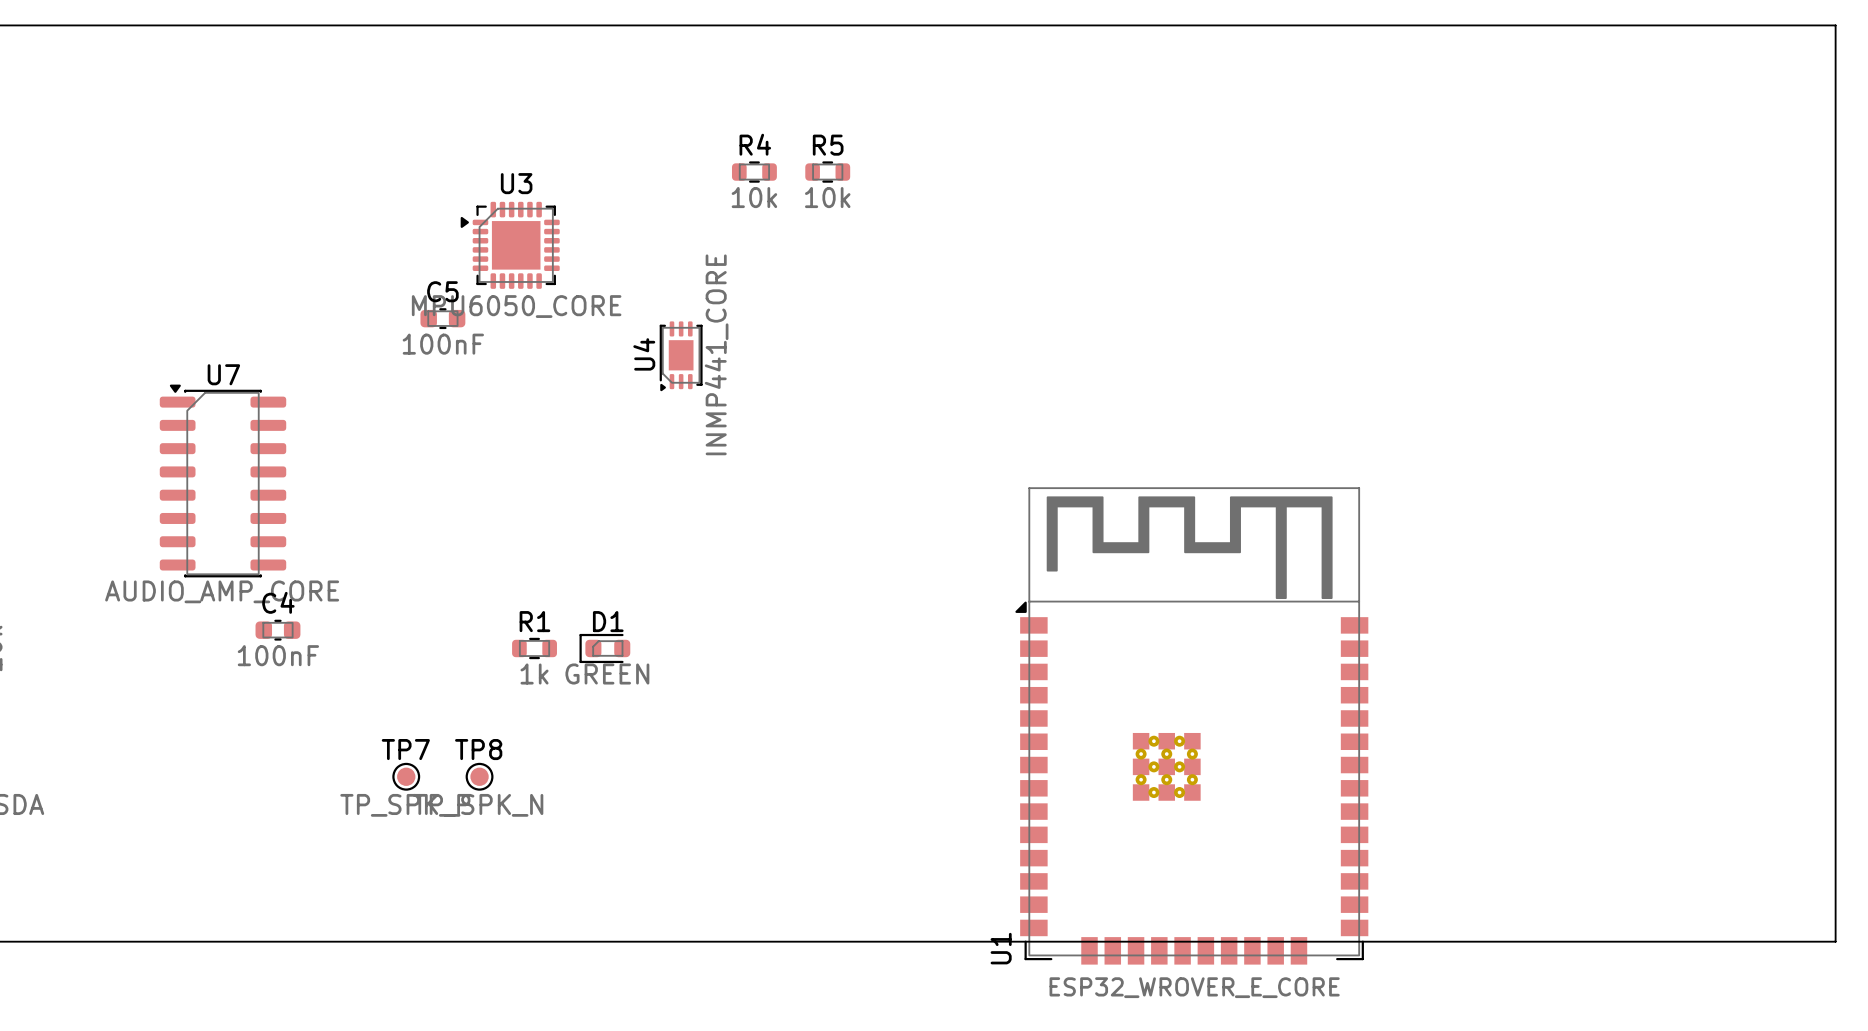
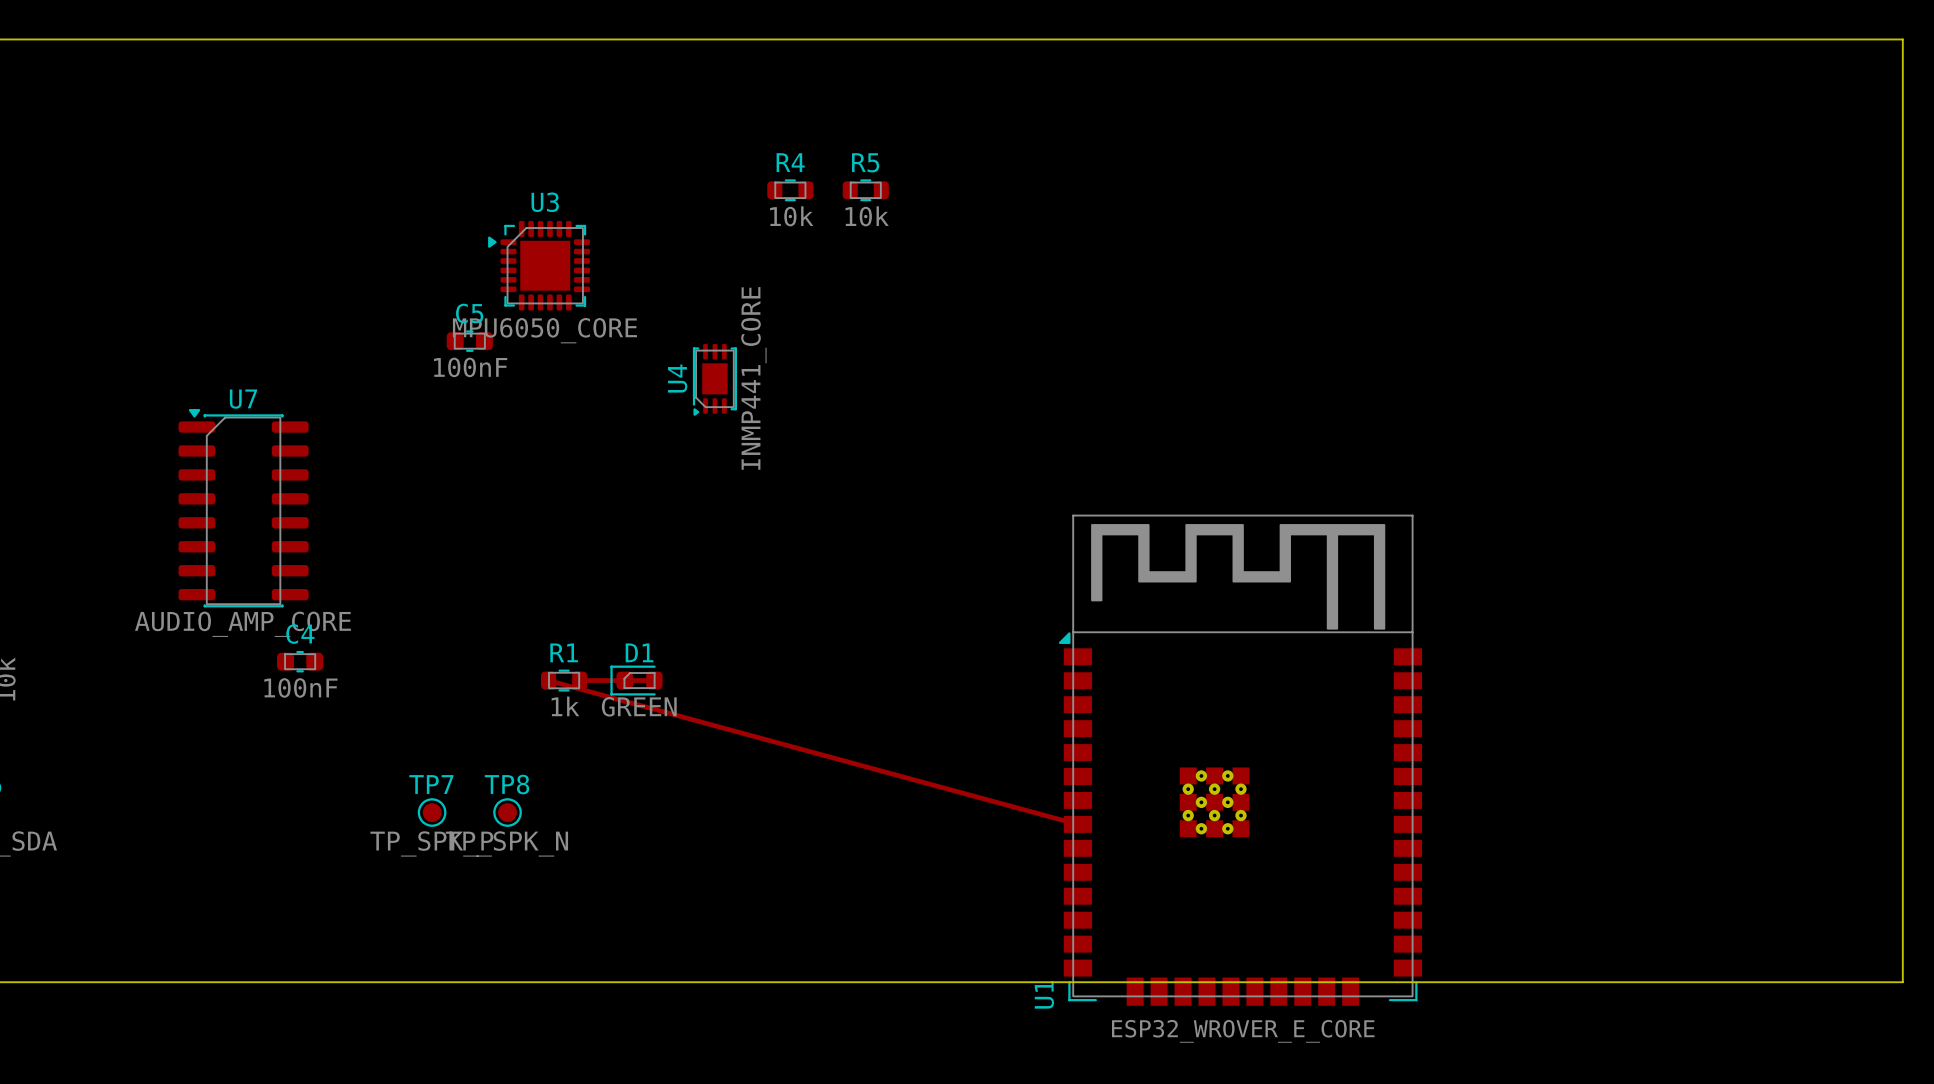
top track: none -> (548, 680) (1077, 824)
top track: none -> (579, 680) (654, 680)

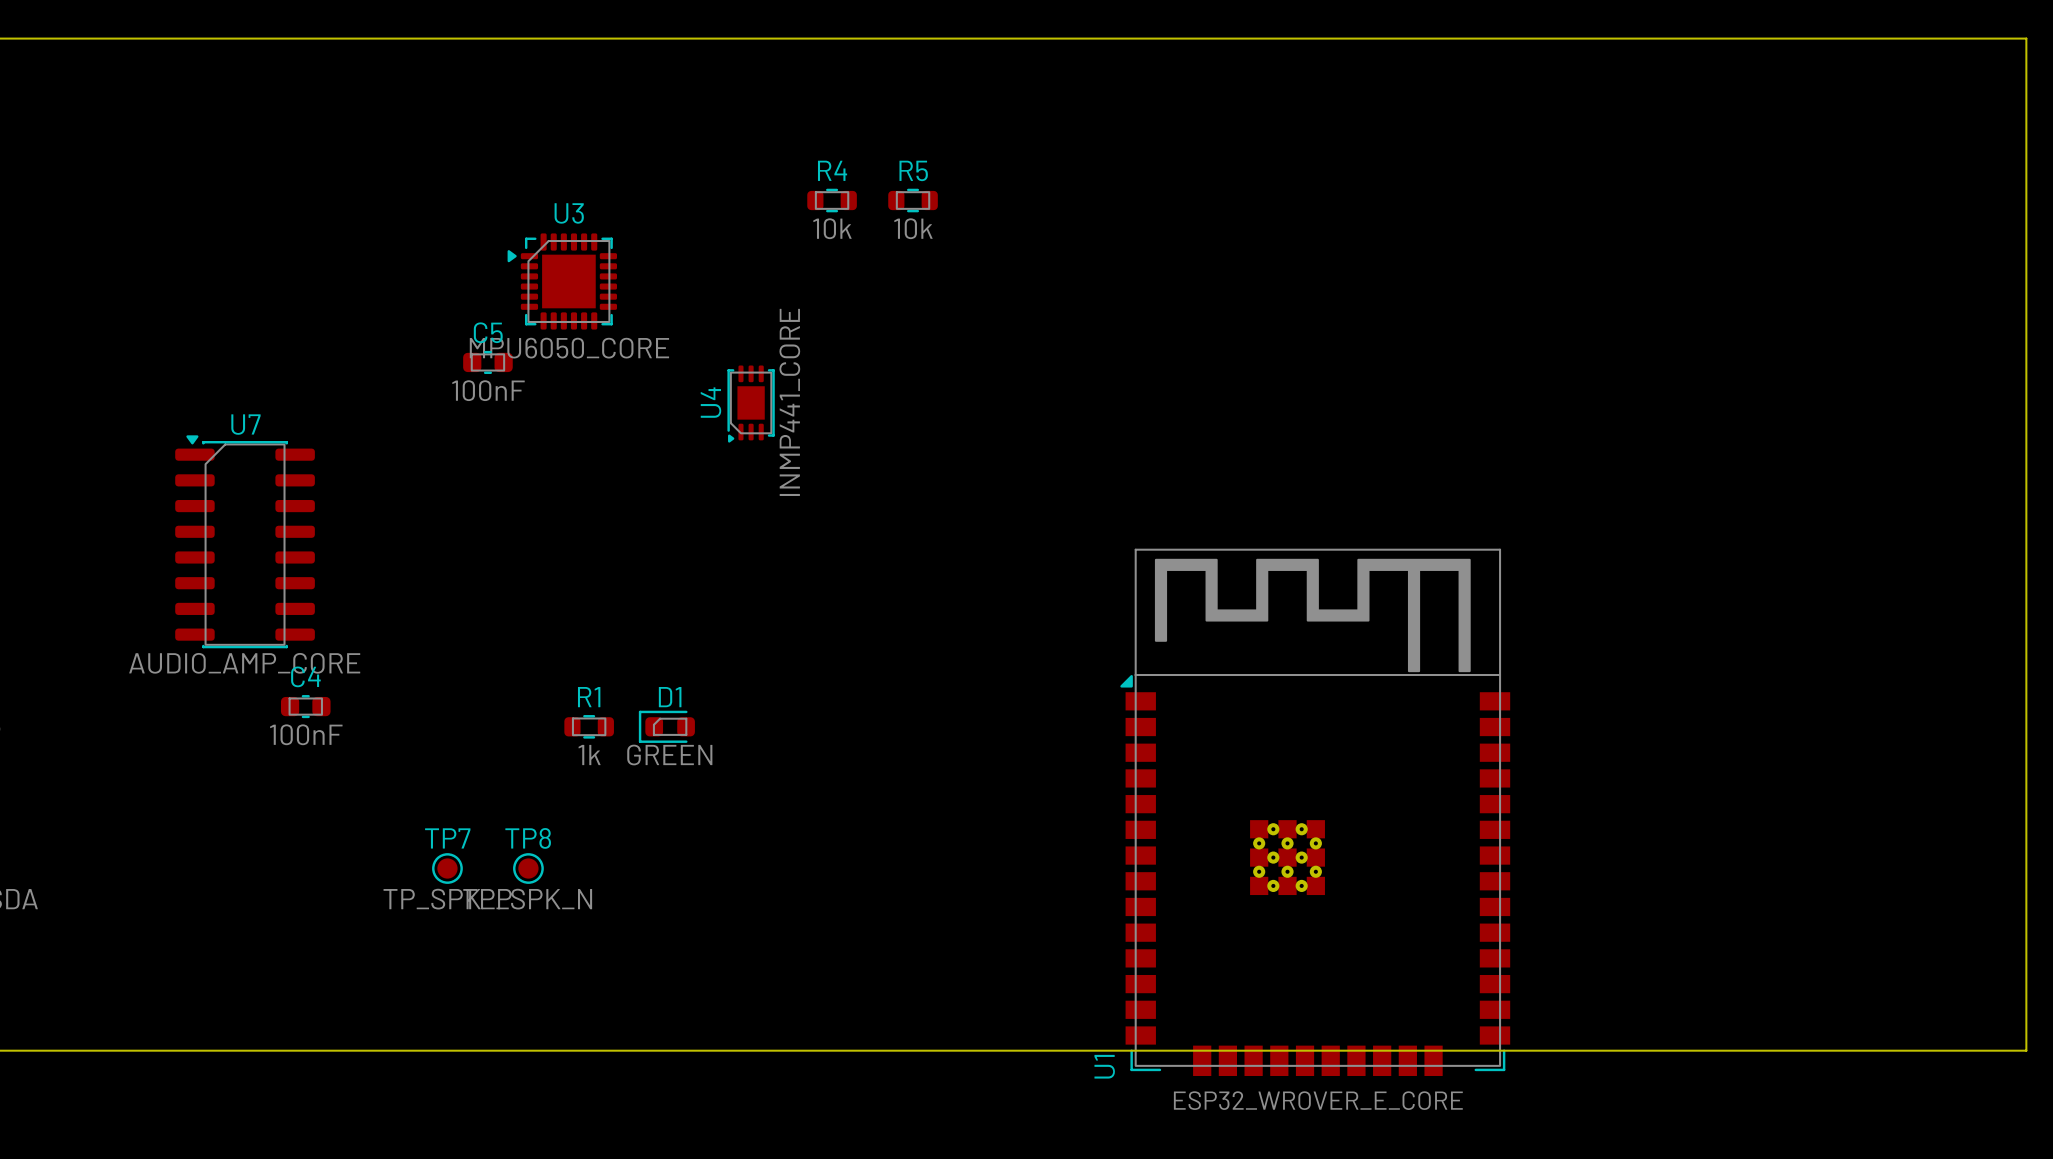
top track: (548, 680) (1077, 824) -> none
top track: (579, 680) (654, 680) -> none

